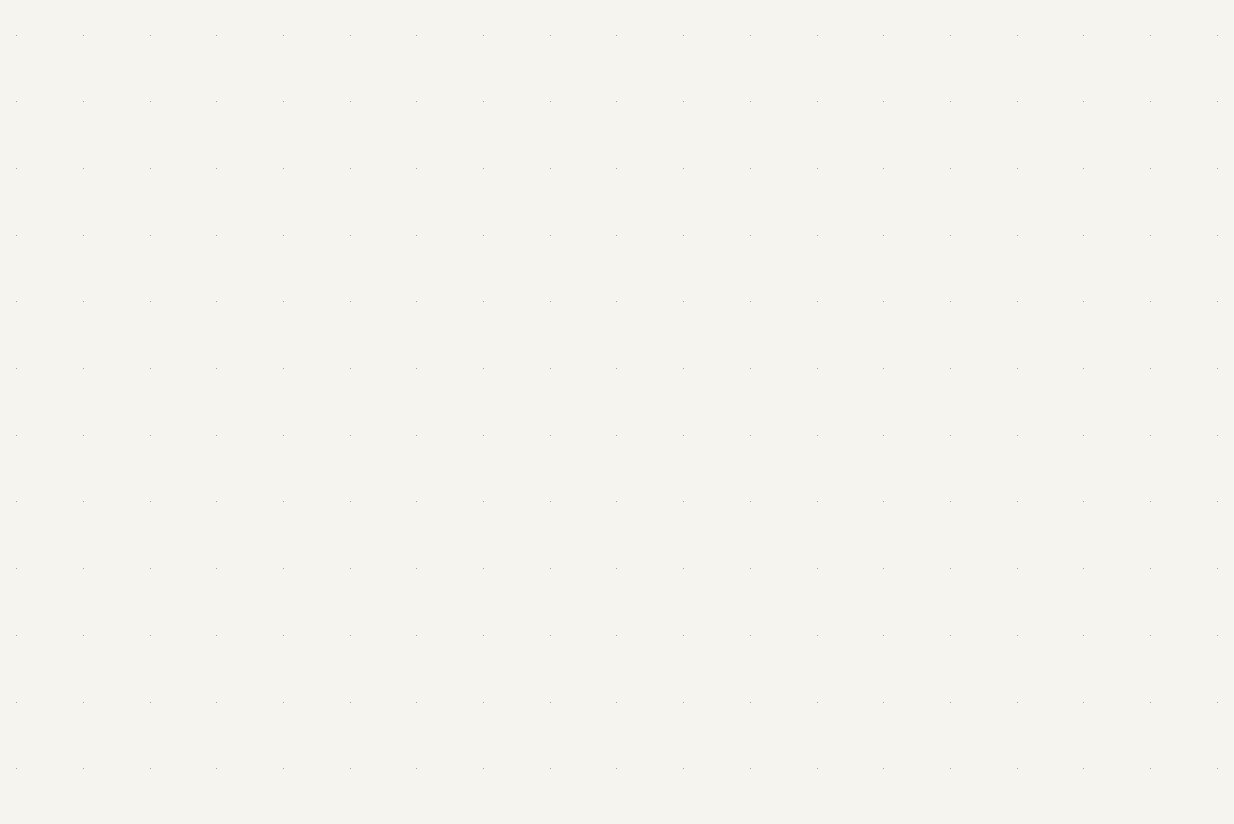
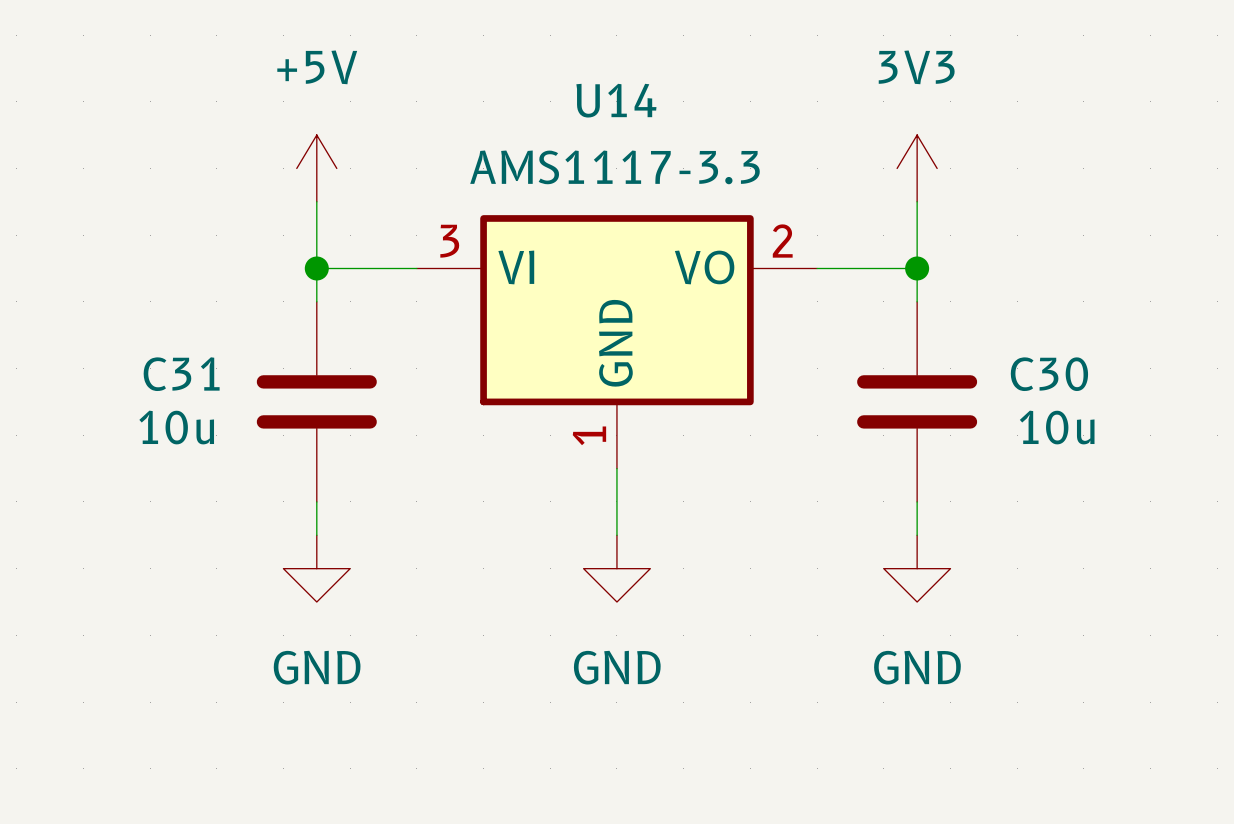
power symbol: none -> +5V (316, 168)
power symbol: none -> 3V3 (917, 168)
wire: none -> (316, 201) (316, 301)
wire: none -> (917, 201) (917, 301)
wire: none -> (316, 268) (416, 268)
junction: none -> (316, 268)
wire: none -> (817, 268) (917, 268)
junction: none -> (917, 268)
U14: none -> AMS1117-3.3 (616, 341)
C31: none -> 10u (316, 401)
C30: none -> 10u (917, 401)
wire: none -> (616, 468) (616, 535)
wire: none -> (316, 501) (316, 535)
wire: none -> (917, 501) (917, 535)
power symbol: none -> GND (316, 568)
power symbol: none -> GND (616, 568)
power symbol: none -> GND (917, 568)

